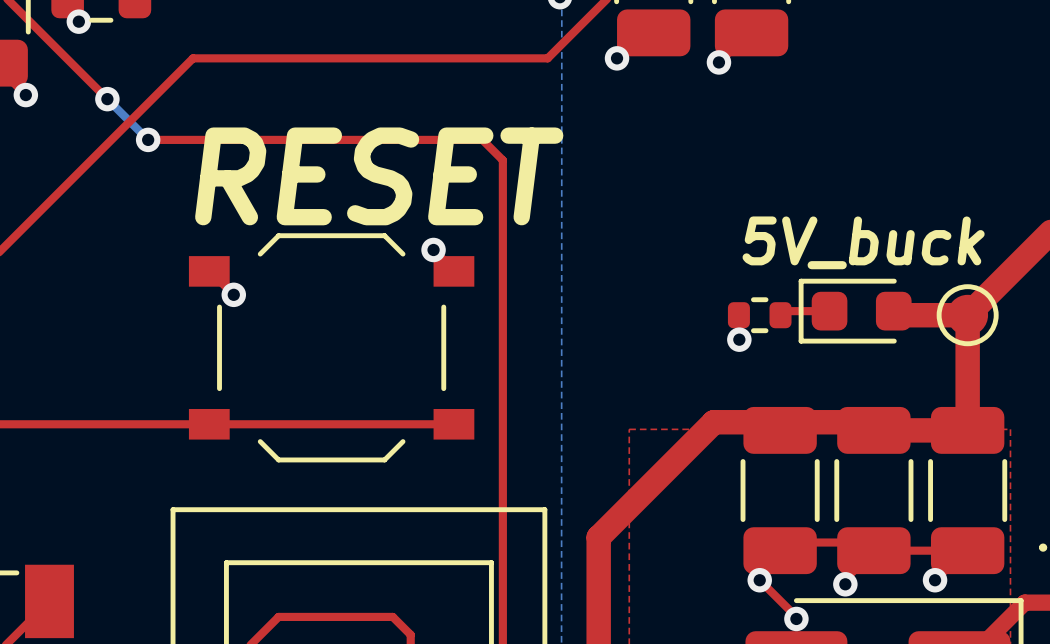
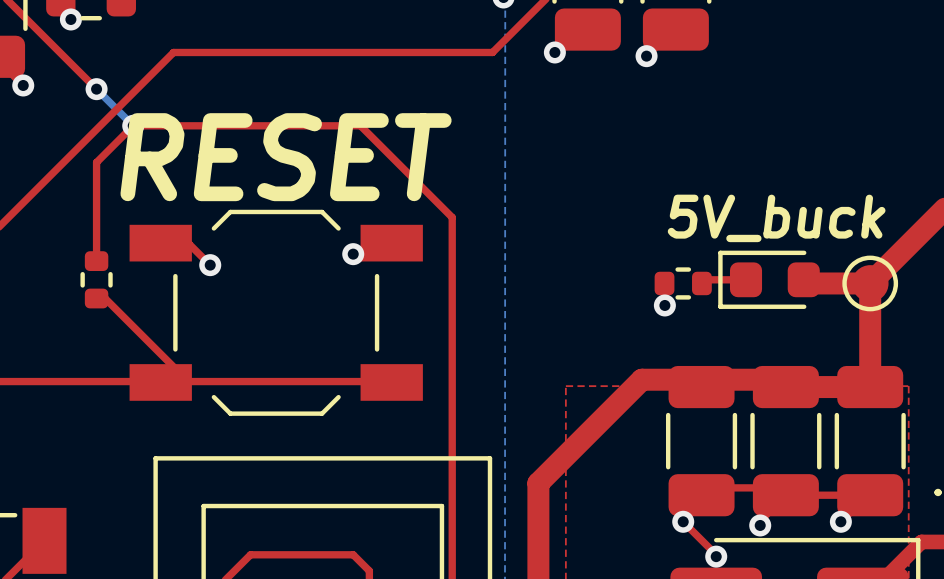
top track: none -> (133, 125) (96, 162) (96, 261)
top track: (400, 139) (482, 139) (502, 160) (502, 241) -> (360, 125) (452, 217)
text position: RESET (379, 176) -> RESET (286, 157)
part footprint: [188, 233, 475, 463] -> [129, 209, 423, 416]
via position: (433, 249) -> (353, 254)
part: none -> (96, 279)
top track: none -> (96, 298) (105, 298) (188, 381)

